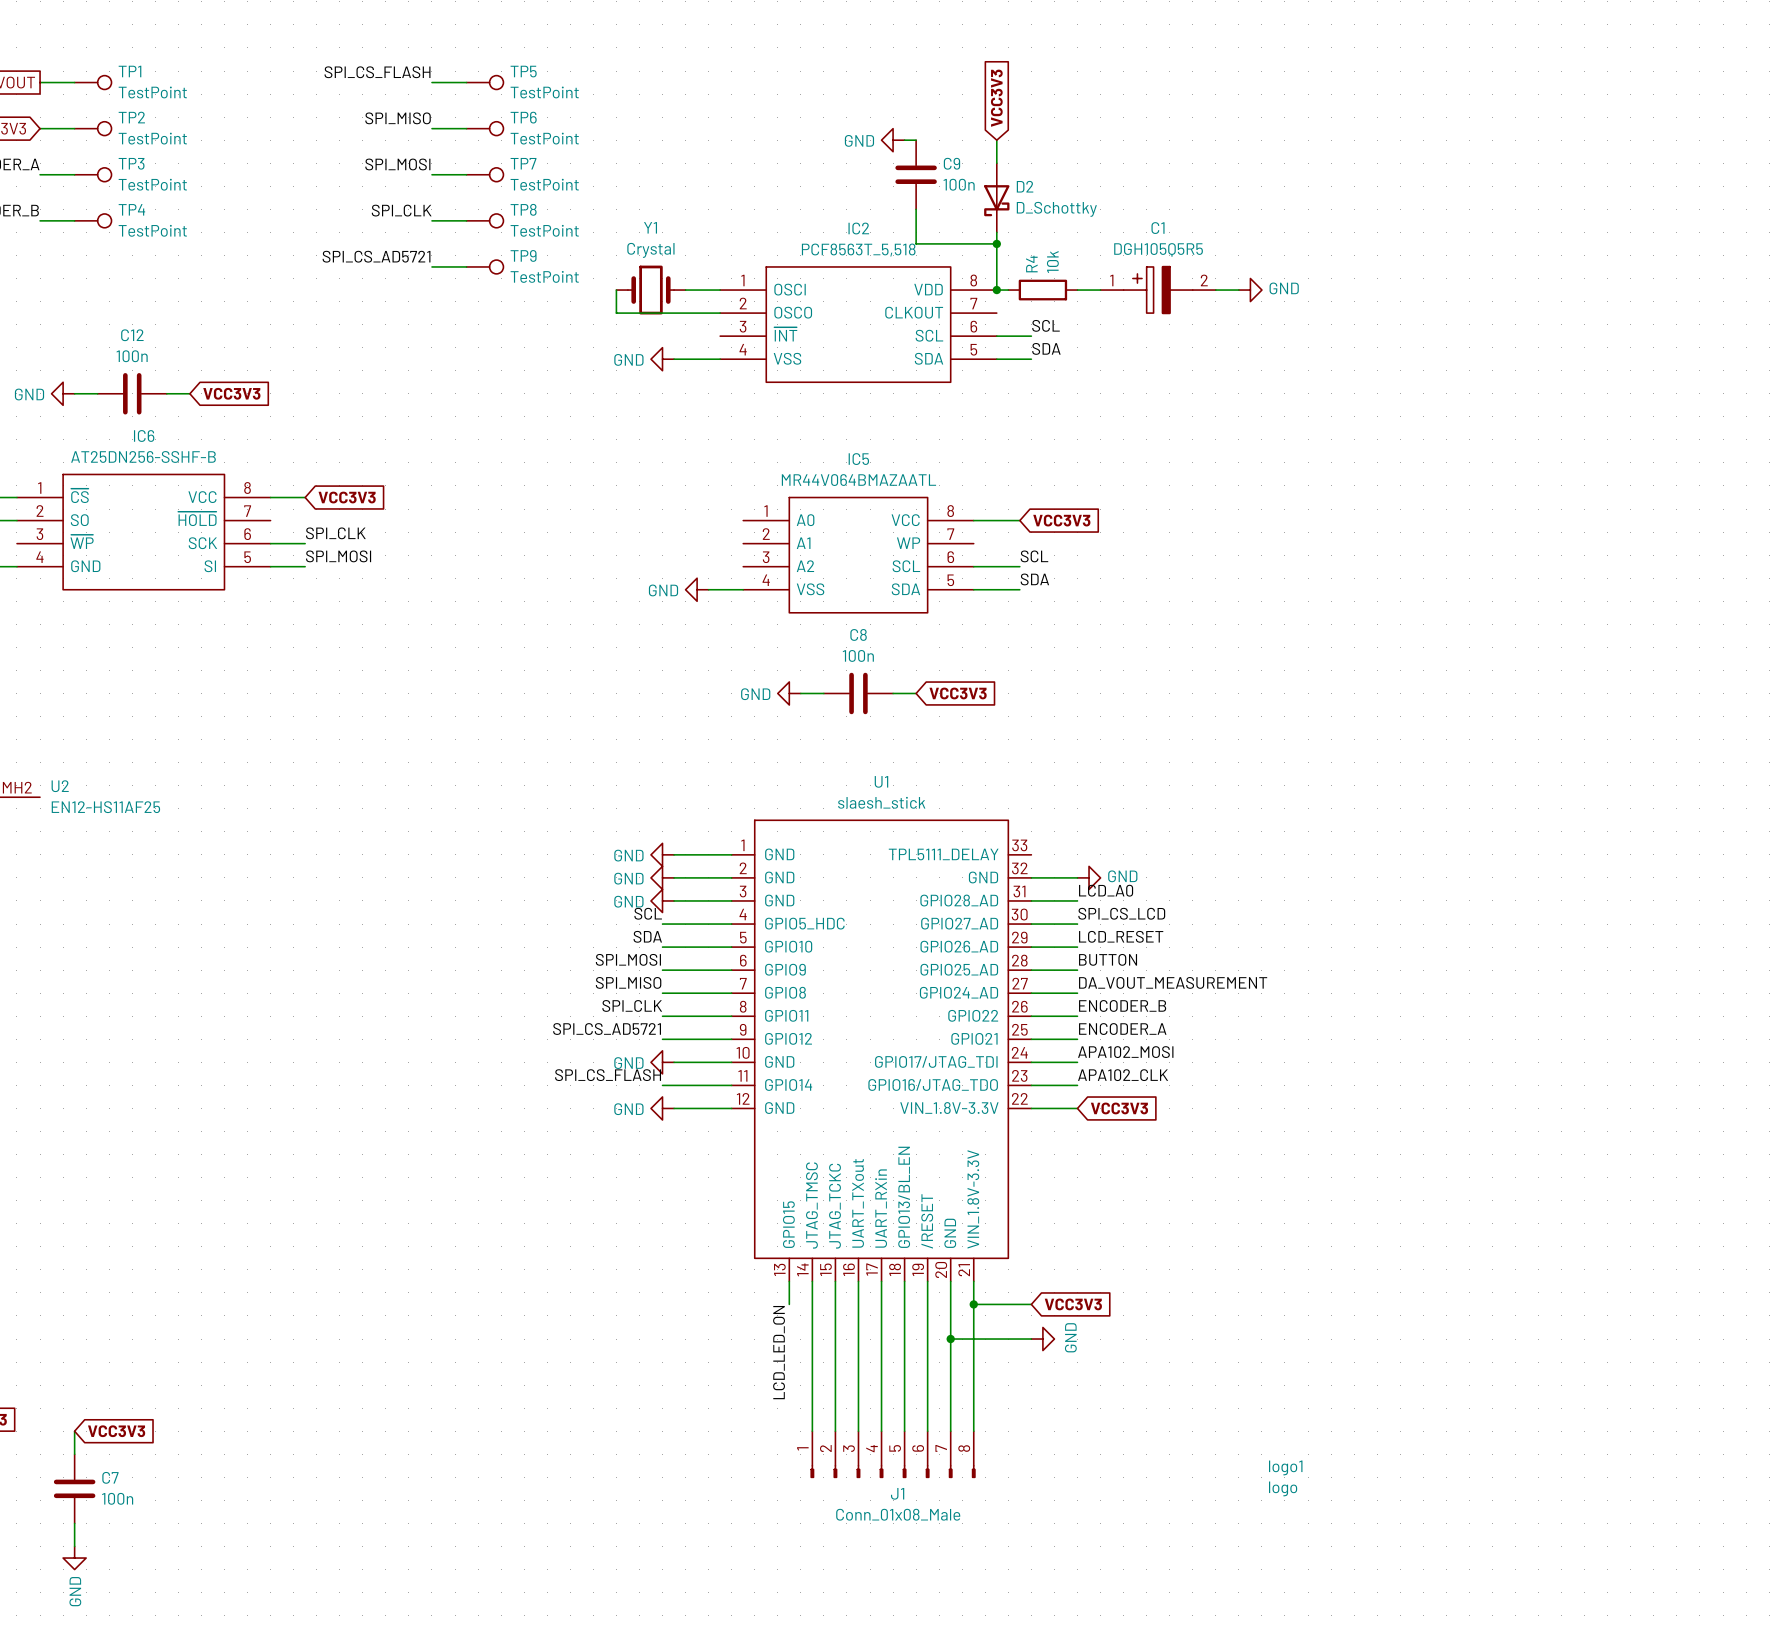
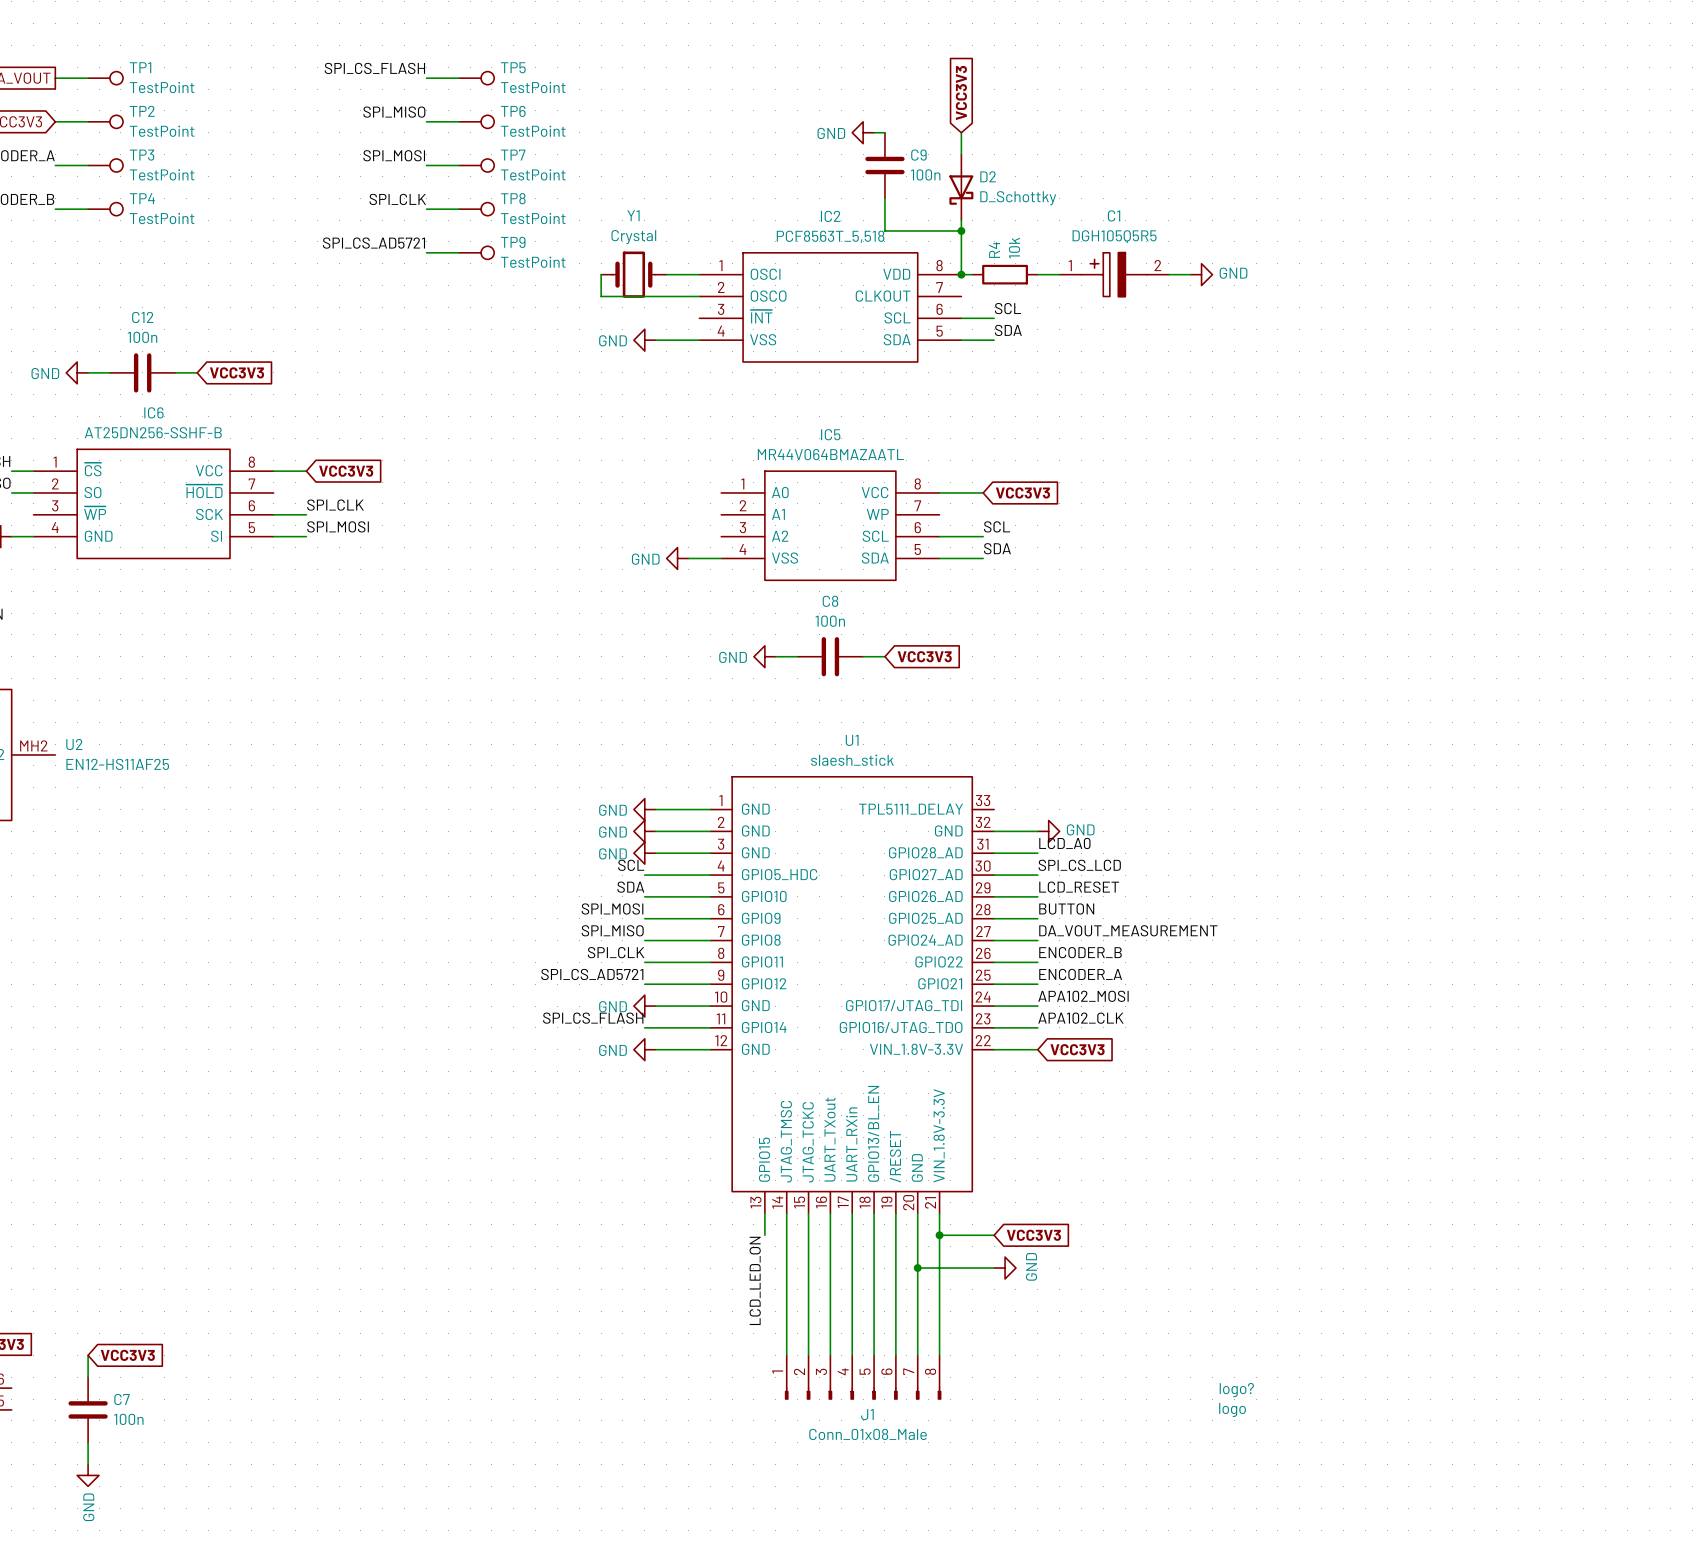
logo1 name: logo1 (1285, 1467) -> logo? (1236, 1390)

